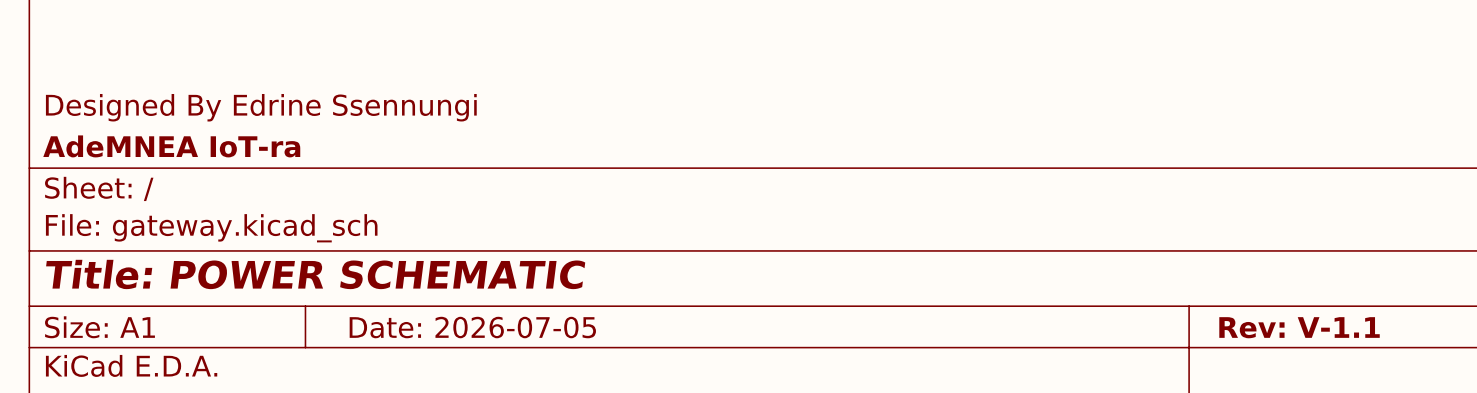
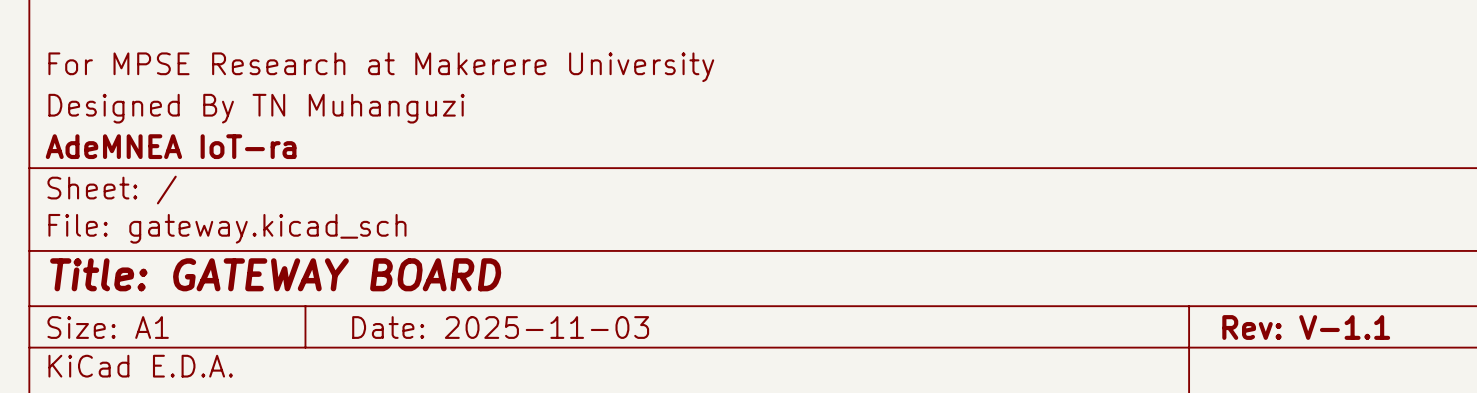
title block: none -> For MPSE Research at Makerere University (381, 67)
title block: Designed By Edrine Ssennungi (261, 107) -> Designed By TN Muhanguzi (256, 108)
title block: Title: POWER SCHEMATIC (315, 274) -> Title: GATEWAY BOARD (275, 274)
title block: Date: 2026-07-05 (472, 327) -> Date: 2025-11-03 (500, 327)

